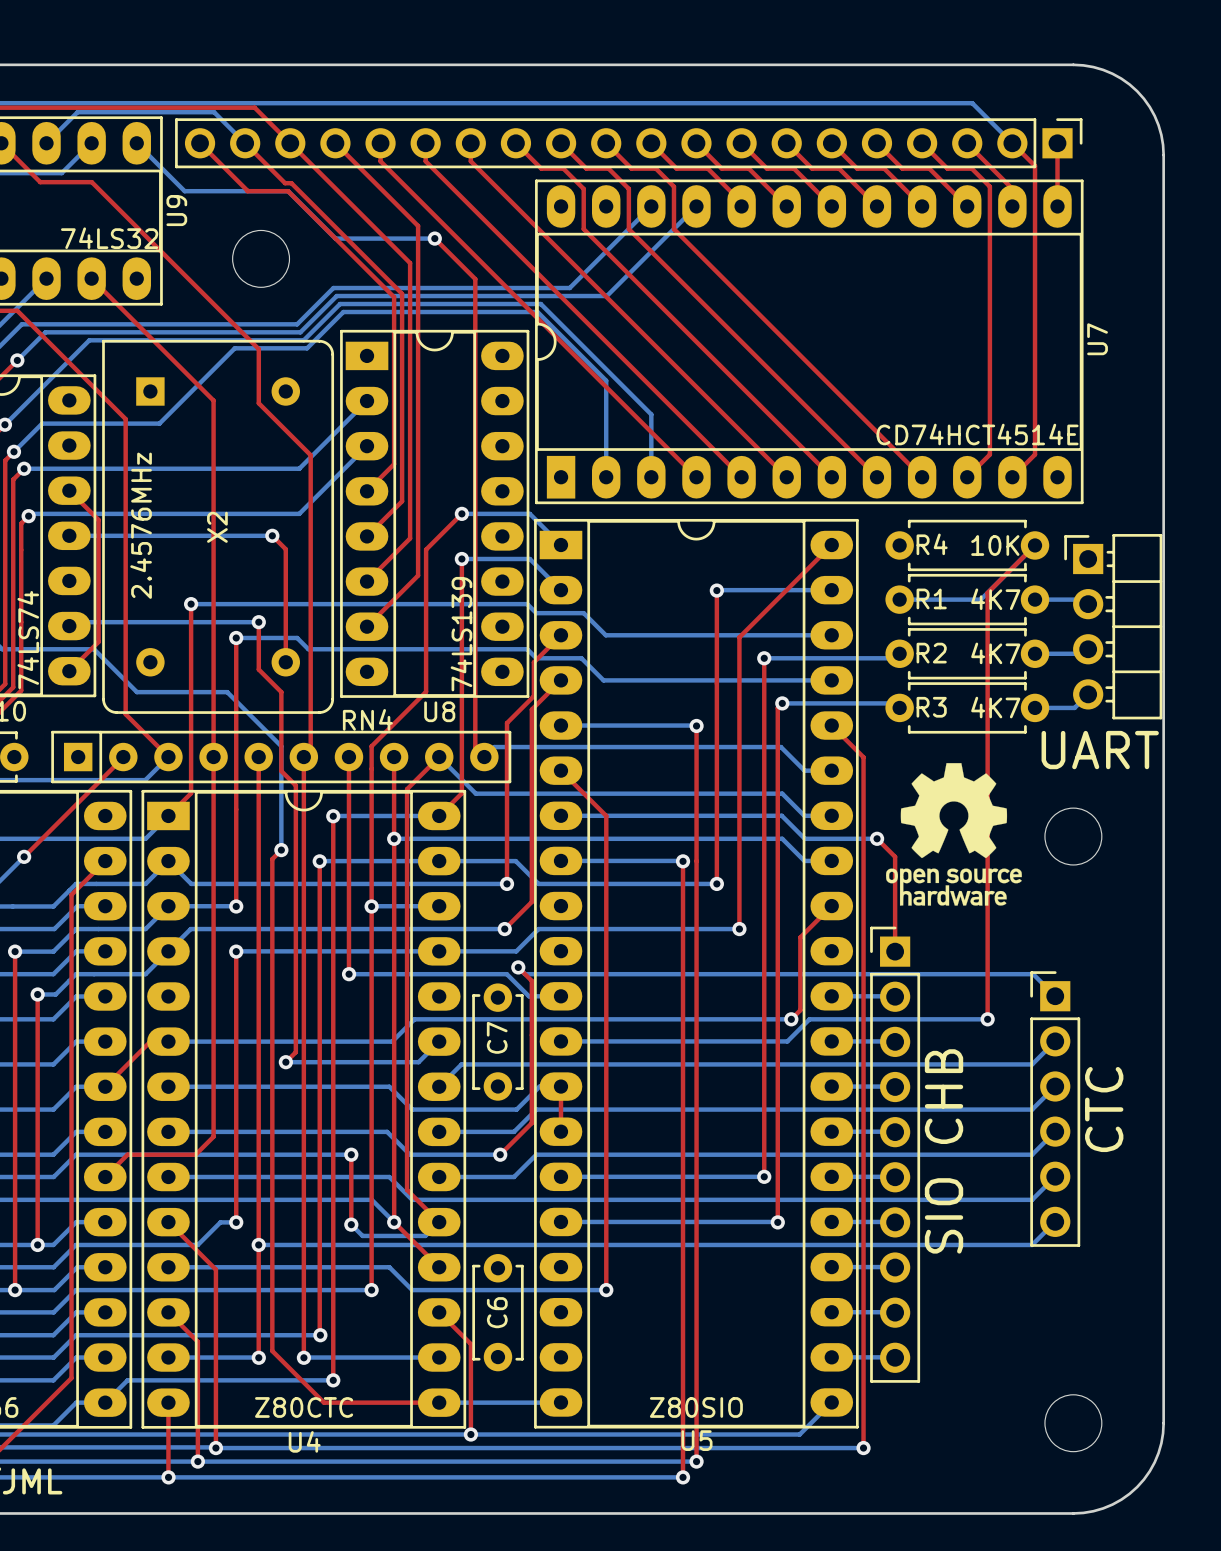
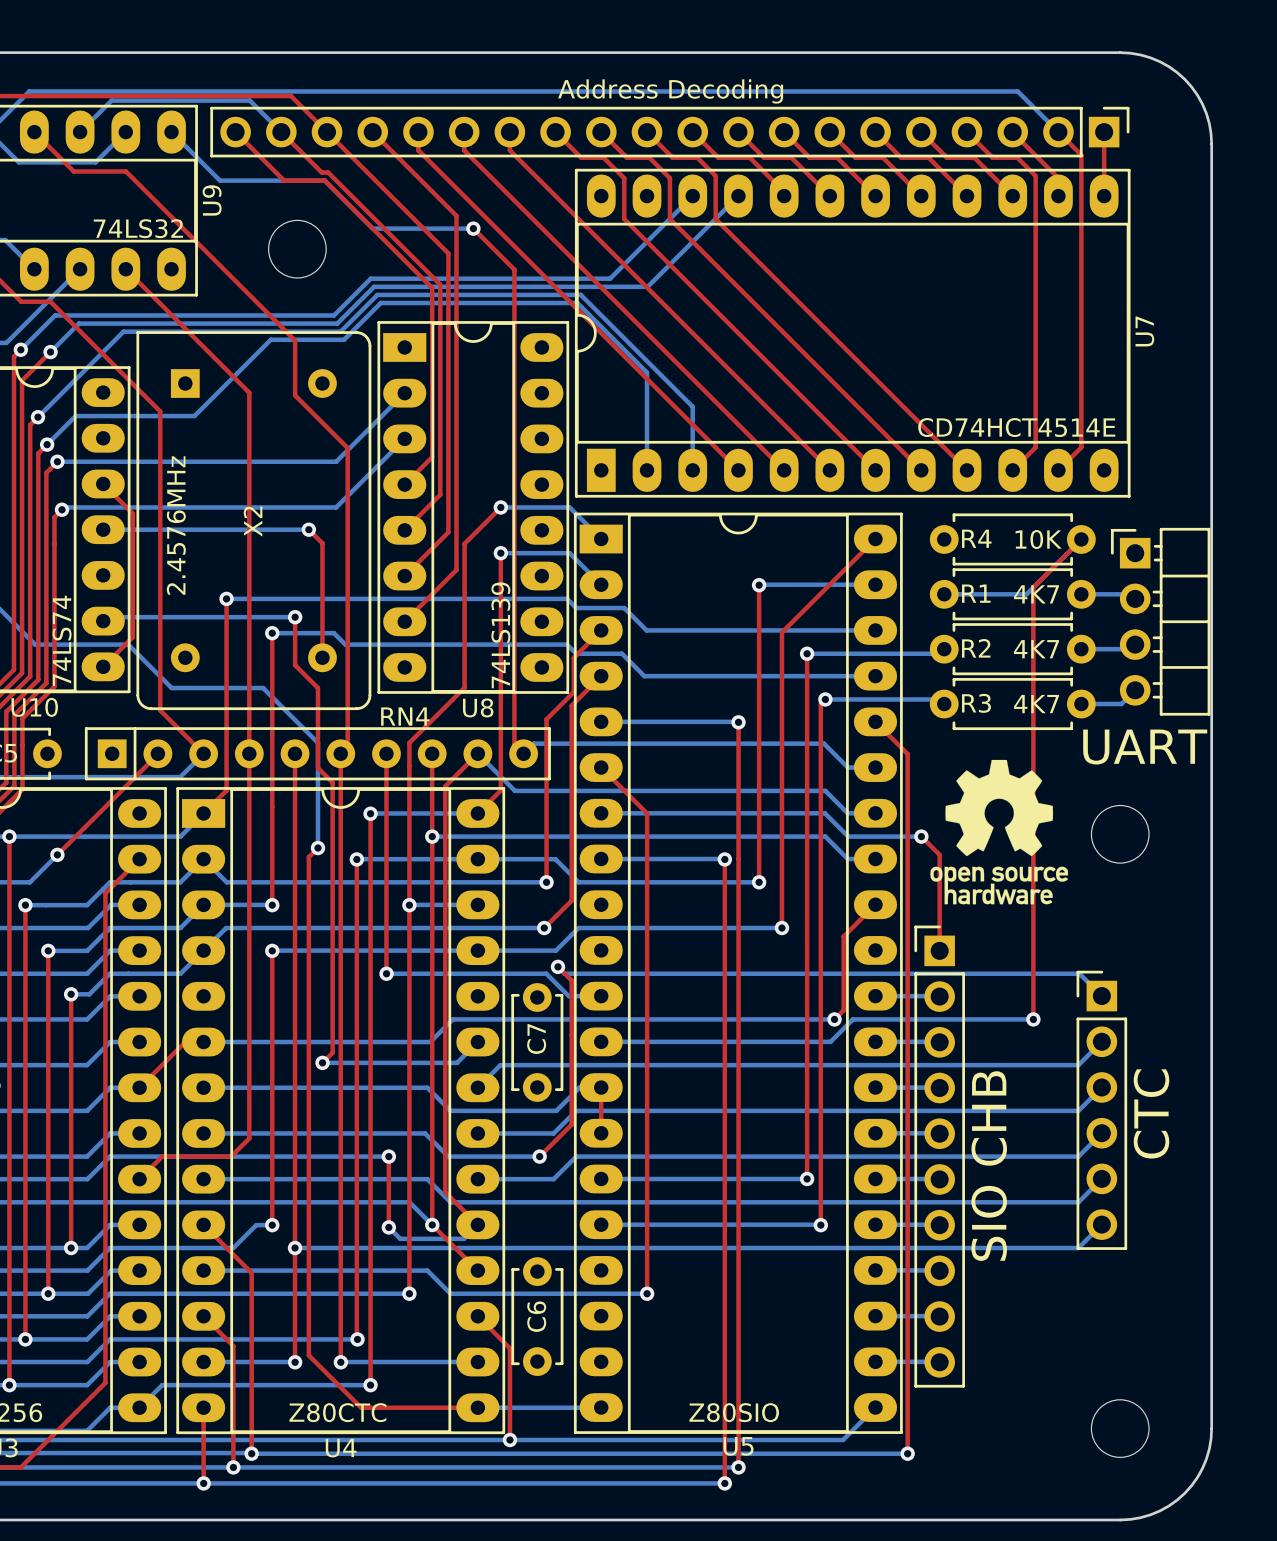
text: none -> Address Decoding (670, 91)

